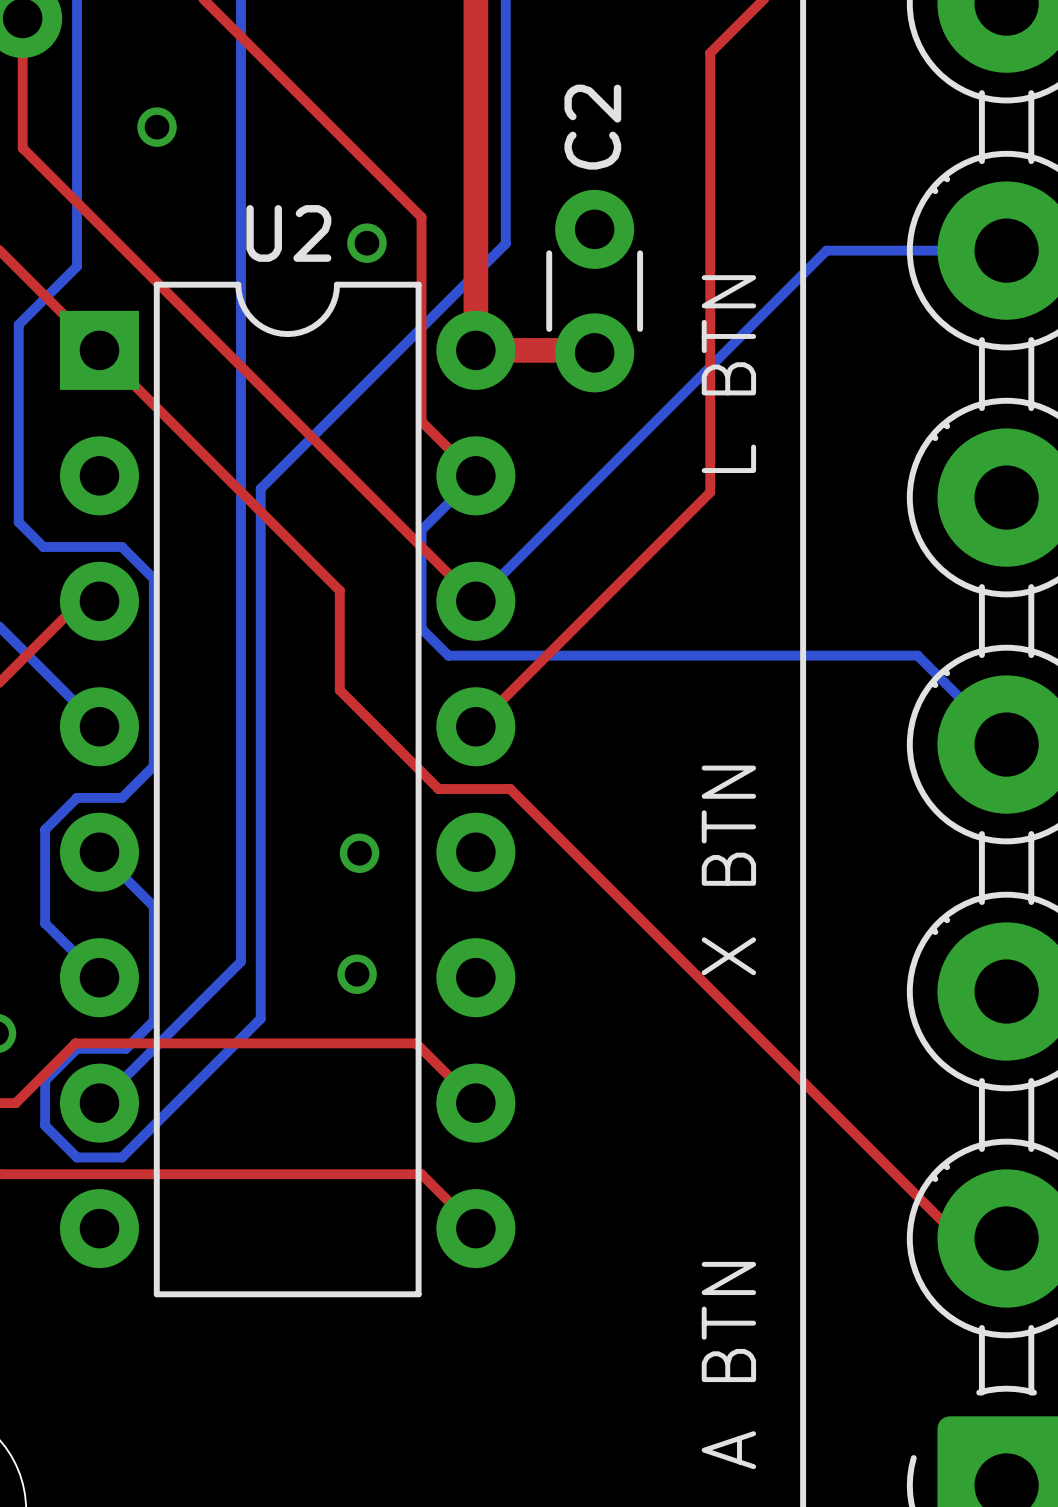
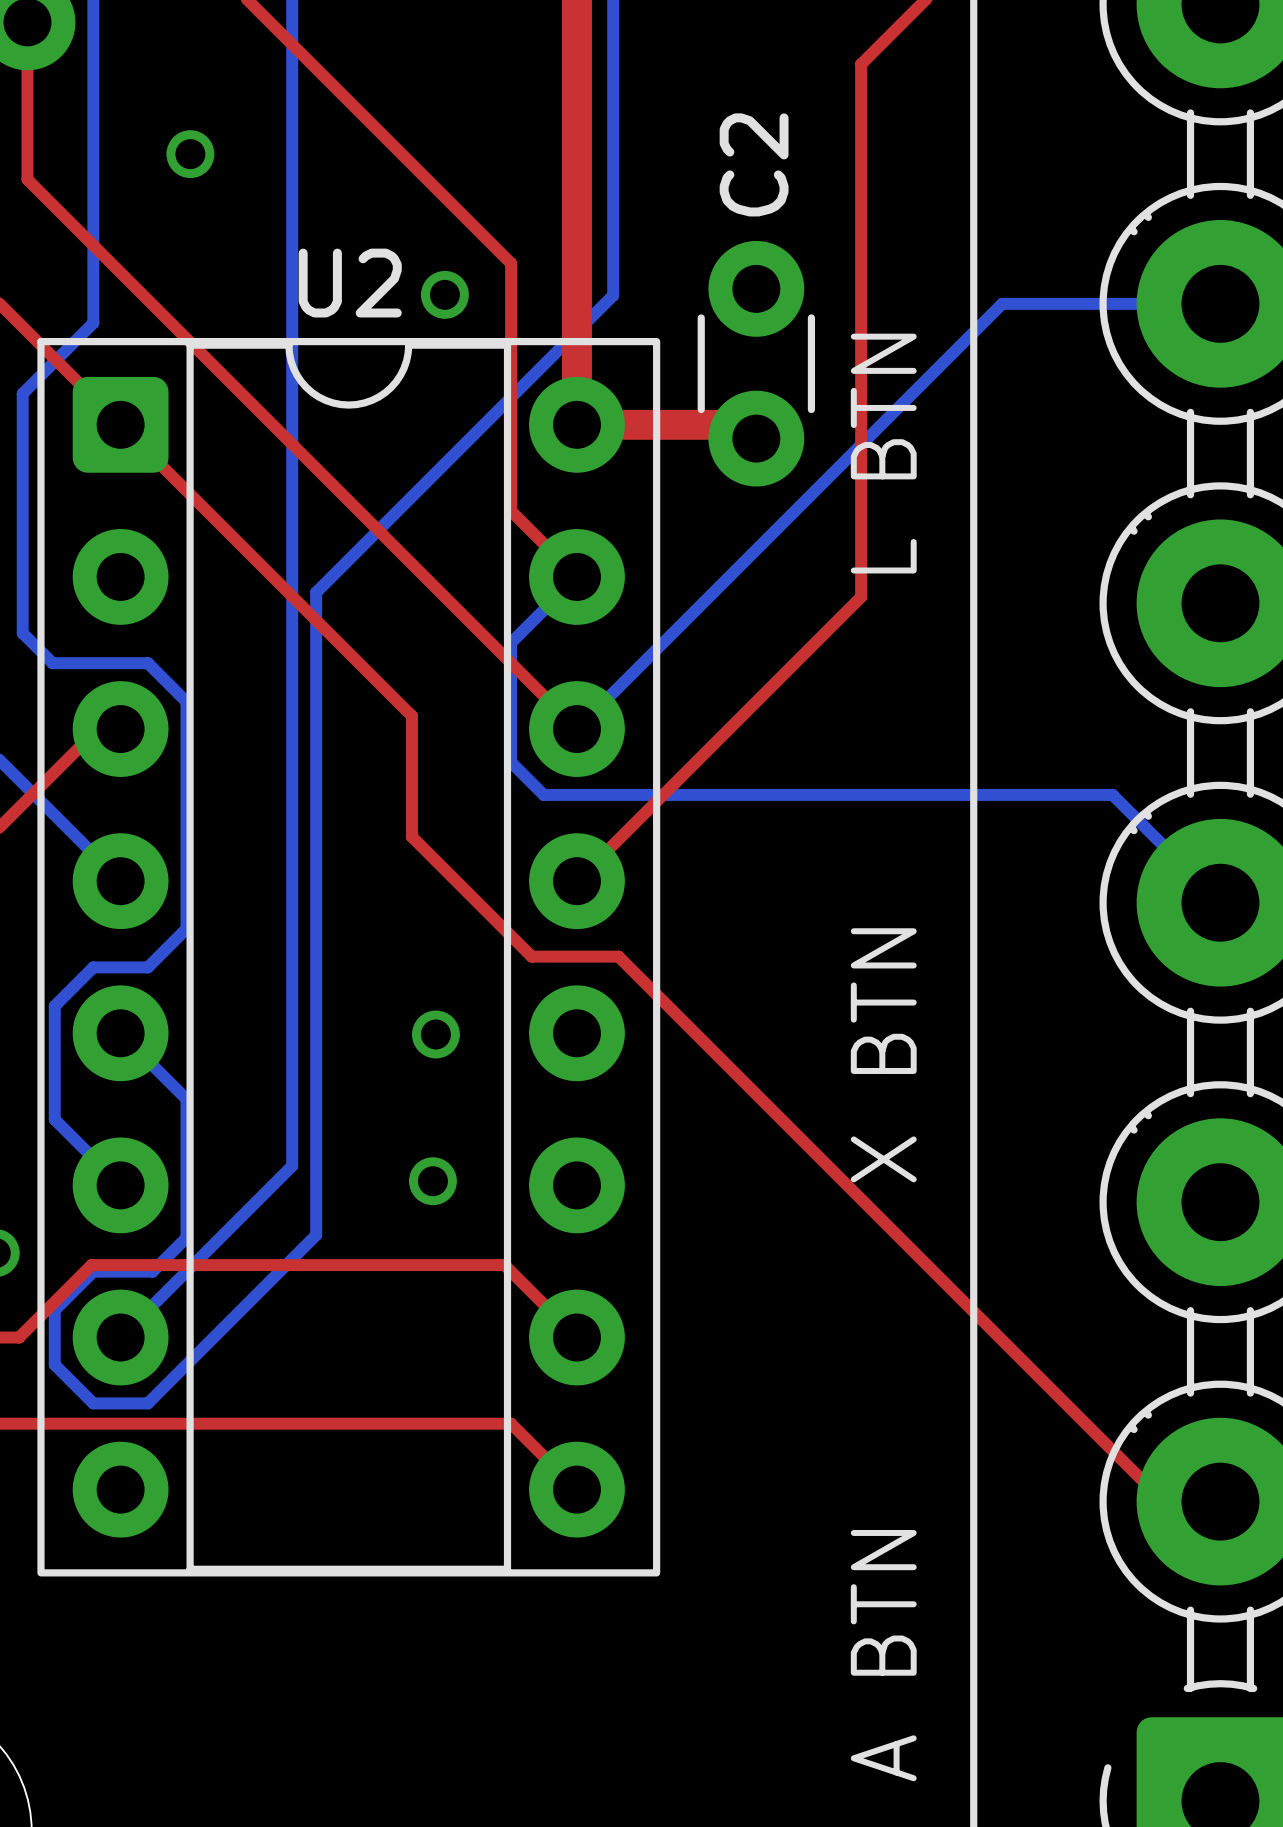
U2 footprint: [59, 281, 516, 1298] -> [37, 337, 661, 1577]
C2 position: (594, 291) -> (756, 363)

